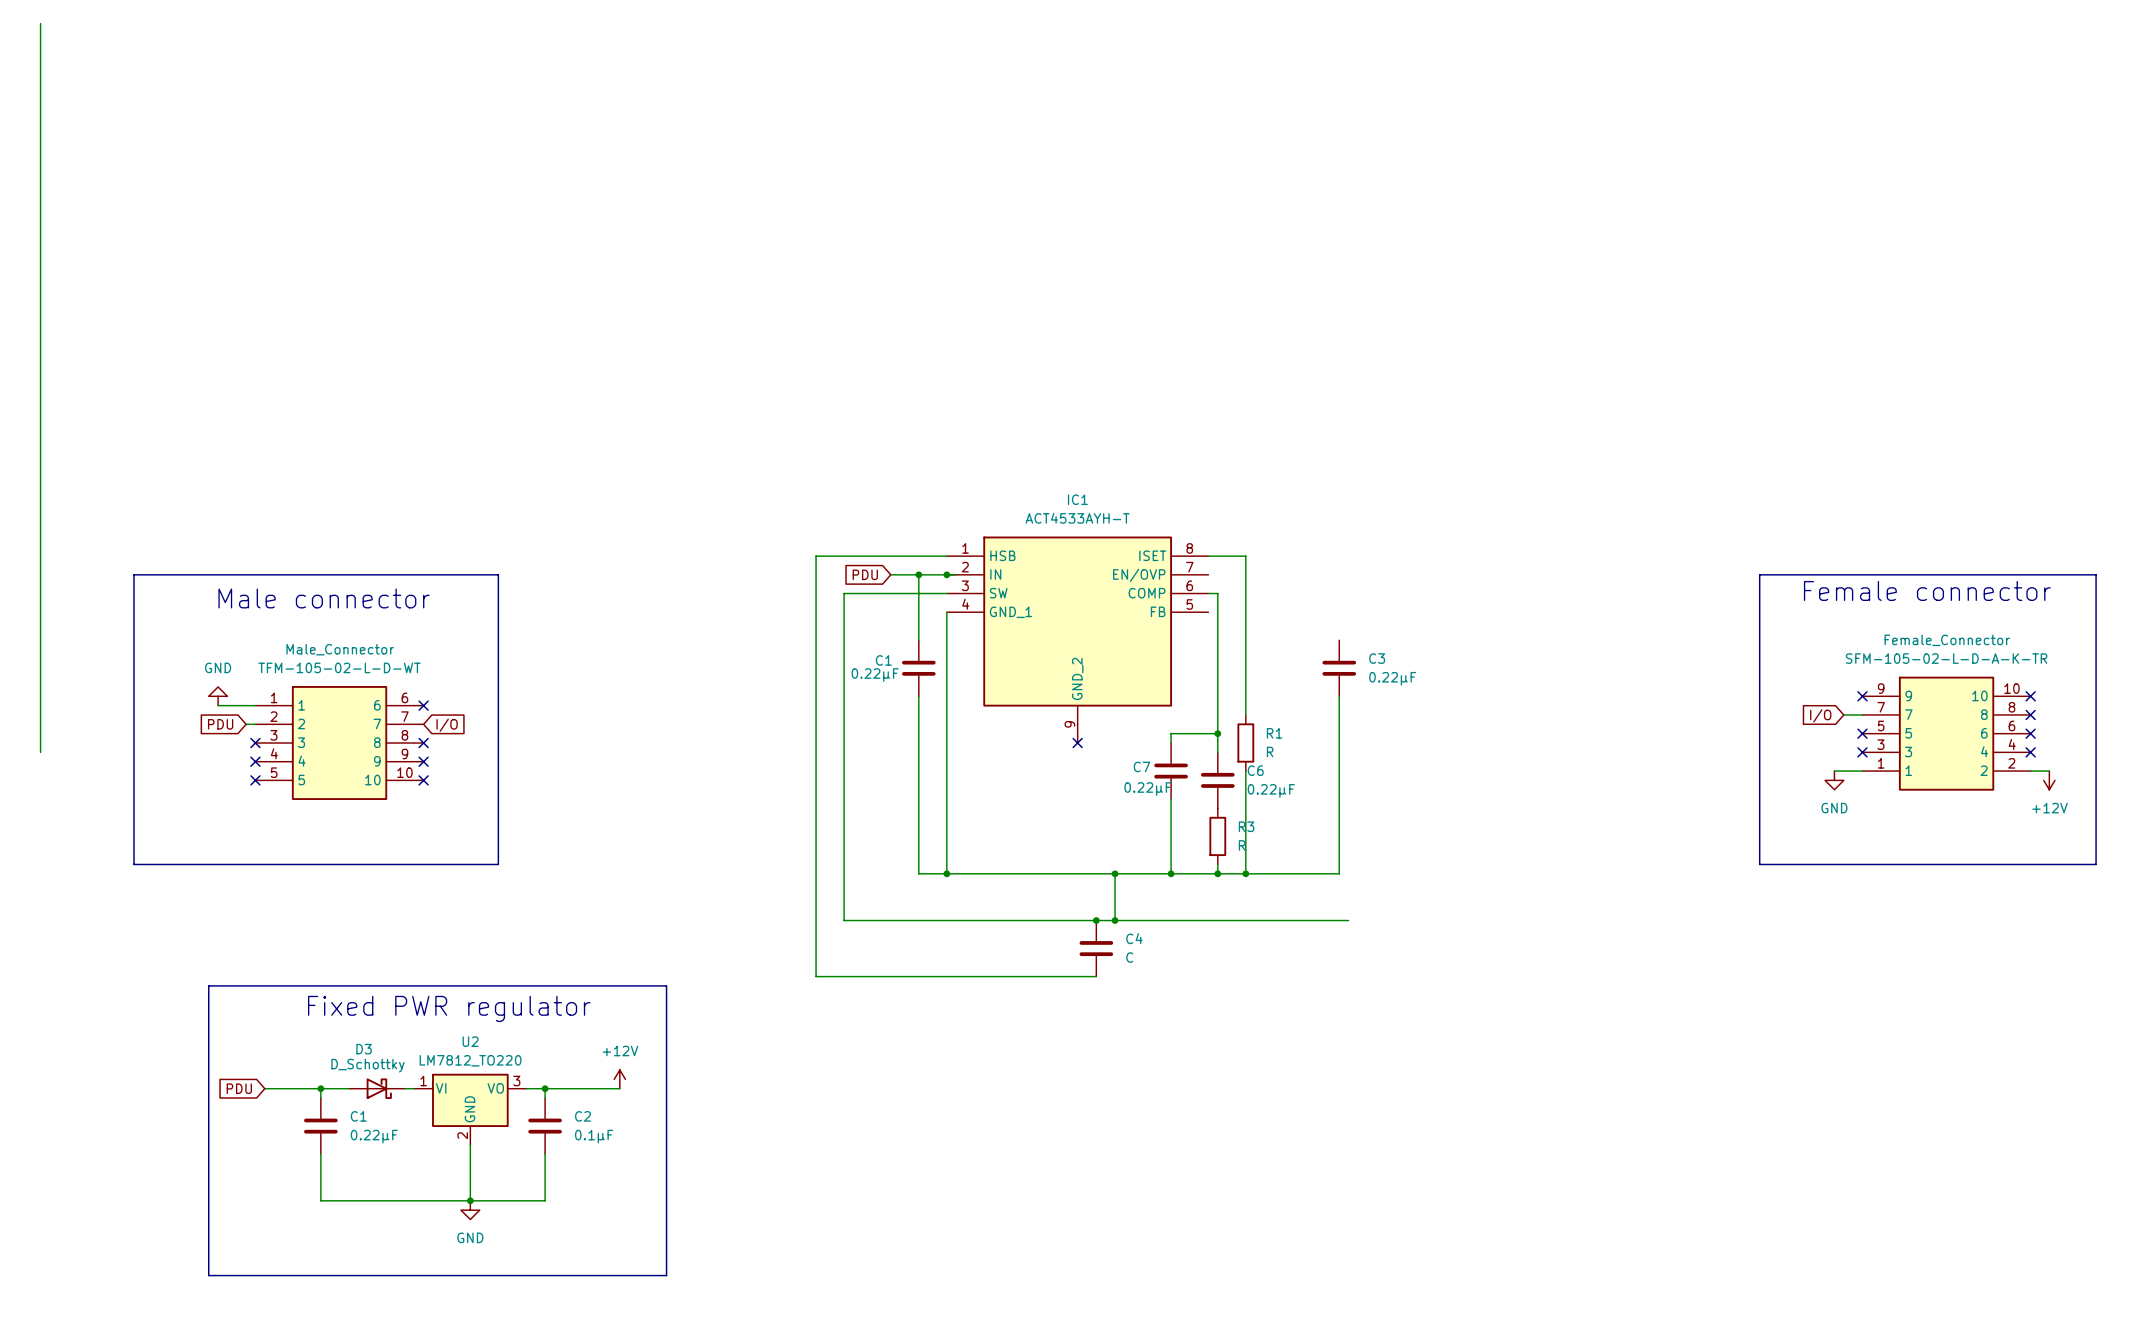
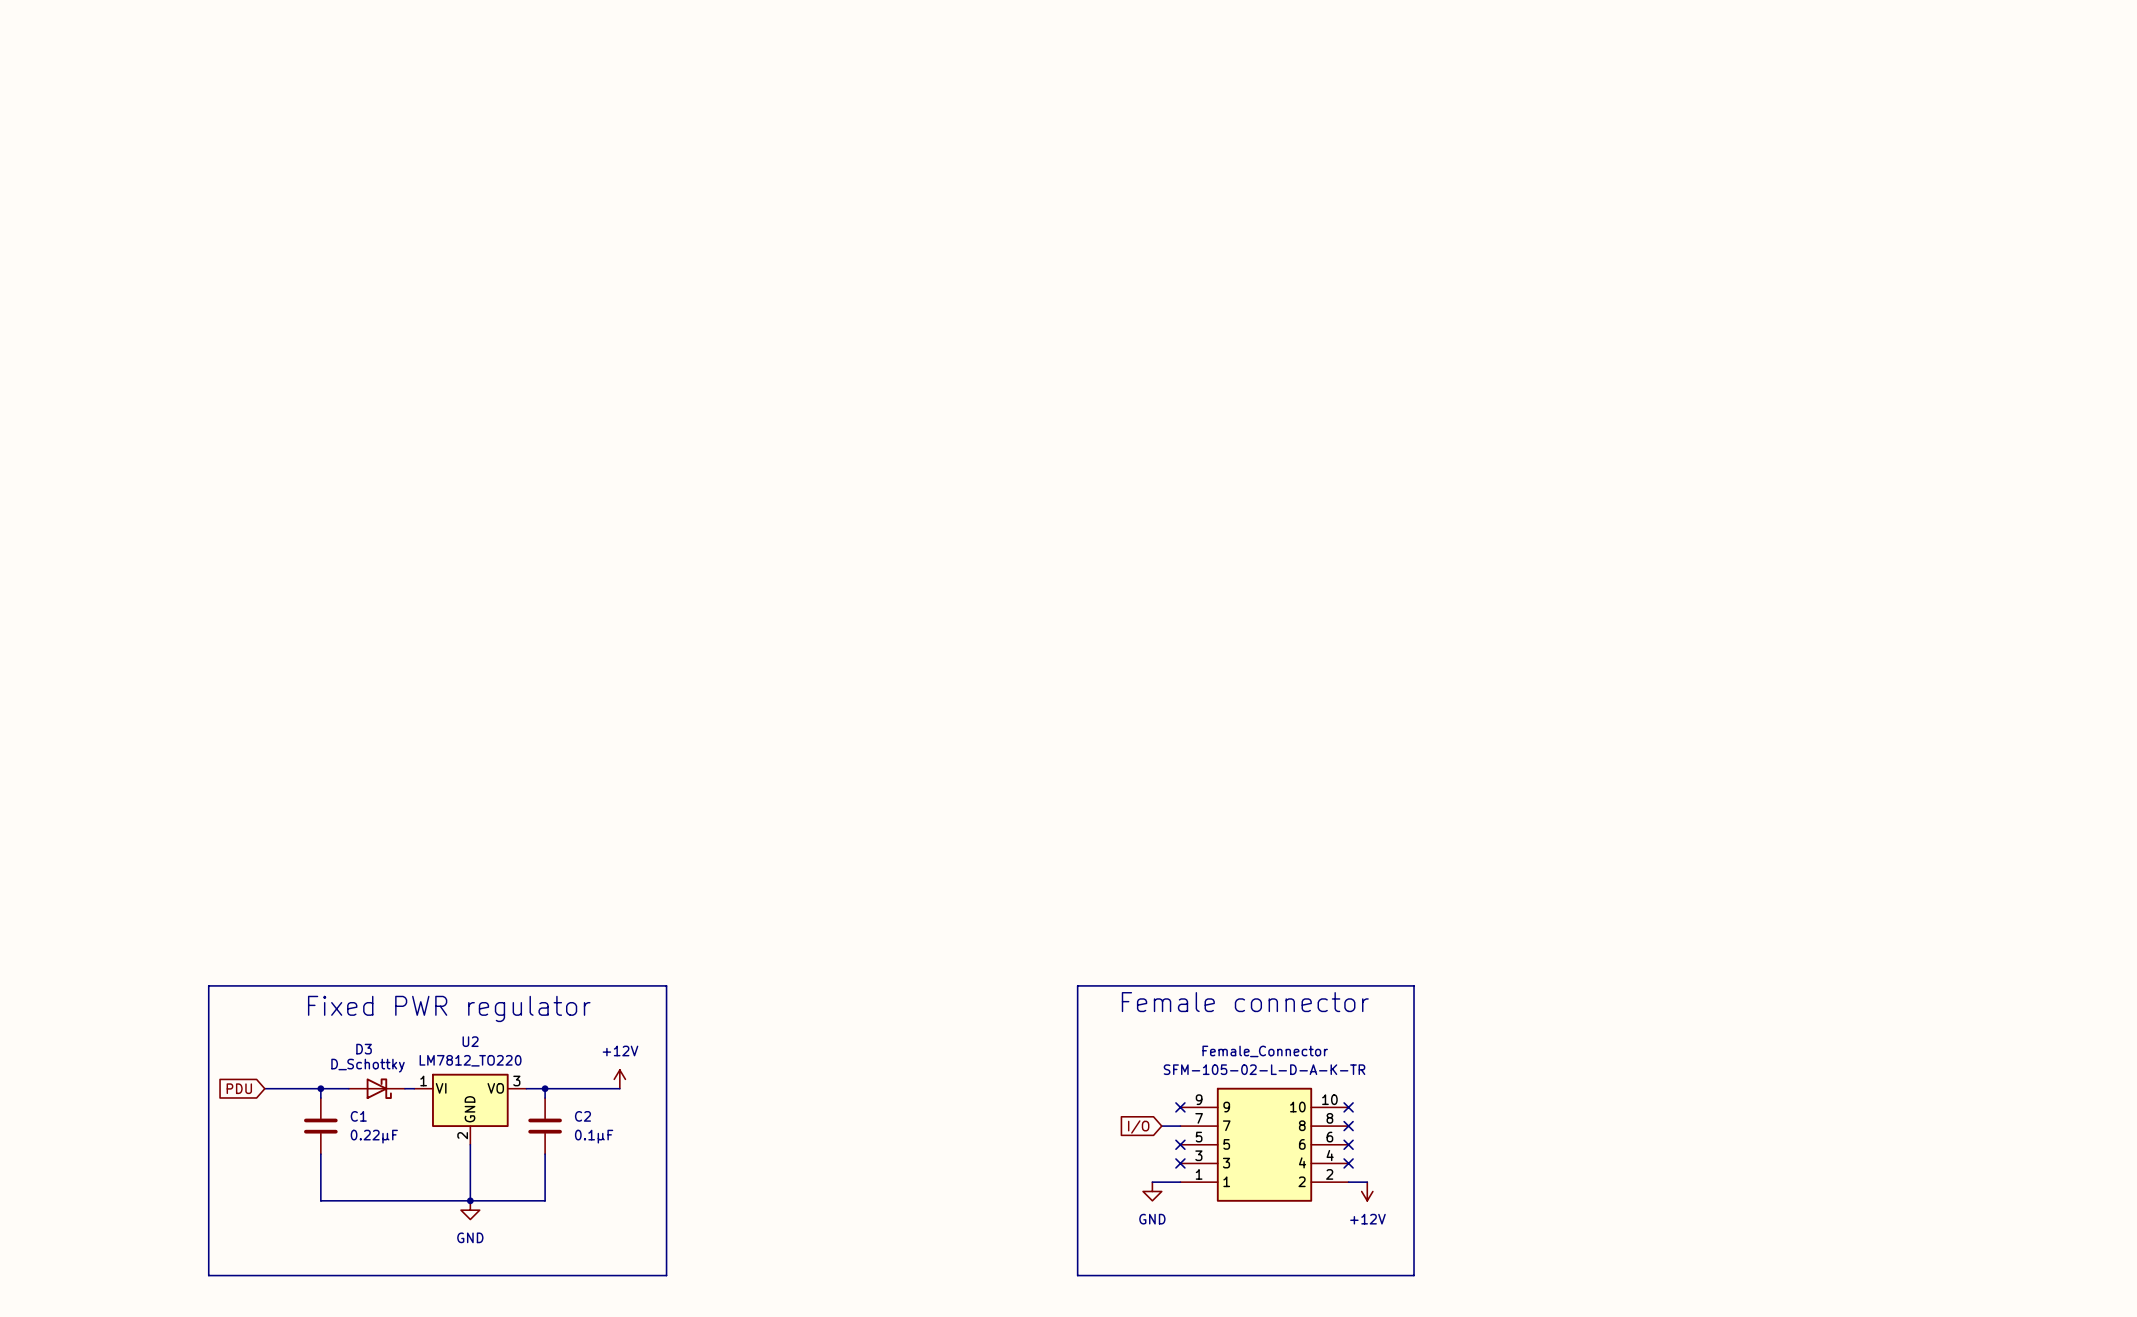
wire: (40, 23) (40, 752) -> none
wire: (946, 556) (816, 556) (816, 976) (1096, 976) -> none
wire: (1208, 556) (1245, 556) (1245, 714) -> none
line: (133, 574) (498, 574) (498, 864) (133, 864) (133, 574) -> none
global label: PDU (865, 574) -> none
wire: (890, 574) (956, 574) -> none
wire: (918, 574) (918, 640) -> none
junction: (918, 574) -> none
junction: (946, 574) -> none
line: (1759, 574) (2096, 574) (2096, 864) (1759, 864) (1759, 574) -> none
text: Female connector (1927, 590) -> none
wire: (946, 593) (844, 593) (844, 920) (1348, 920) -> none
wire: (1208, 593) (1217, 593) (1217, 752) -> none
text: Male connector (324, 598) -> none
wire: (946, 612) (946, 873) -> none
IC1: ACT4533AYH-T (1077, 639) -> none
C1: 0.22µF (918, 668) -> none
C3: 0.22µF (1339, 668) -> none
power symbol: GND (218, 696) -> none
wire: (918, 696) (918, 873) (1339, 873) (1339, 696) -> none
no-connect mark: (1862, 696) -> none
no-connect mark: (2030, 696) -> none
wire: (218, 705) (255, 705) -> none
no-connect mark: (423, 705) -> none
wire: (1843, 714) (1862, 714) -> none
no-connect mark: (2030, 714) -> none
global label: I/O (1820, 715) -> none
global label: PDU (220, 724) -> none
wire: (246, 724) (255, 724) -> none
global label: I/O (447, 725) -> none
wire: (1217, 733) (1171, 733) (1171, 743) -> none
junction: (1217, 733) -> none
no-connect mark: (1862, 733) -> none
Female_Connector: SFM-105-02-L-D-A-K-TR (1946, 733) -> none
no-connect mark: (2030, 733) -> none
no-connect mark: (255, 743) -> none
Male_Connector: TFM-105-02-L-D-WT (339, 743) -> none
no-connect mark: (423, 743) -> none
no-connect mark: (1077, 743) -> none
R1: R (1245, 743) -> none
no-connect mark: (1862, 752) -> none
no-connect mark: (2030, 752) -> none
no-connect mark: (255, 761) -> none
no-connect mark: (423, 761) -> none
C7: 0.22µF (1171, 771) -> none
wire: (1245, 771) (1245, 873) -> none
wire: (1834, 771) (1862, 771) -> none
wire: (2030, 771) (2049, 771) -> none
no-connect mark: (255, 780) -> none
no-connect mark: (423, 780) -> none
C6: 0.22µF (1217, 780) -> none
power symbol: GND (1834, 780) -> none
power symbol: +12V (2049, 780) -> none
wire: (1171, 799) (1171, 873) -> none
R3: R (1217, 836) -> none
wire: (1217, 864) (1217, 873) -> none
junction: (946, 873) -> none
wire: (1115, 873) (1115, 920) -> none
junction: (1115, 873) -> none
junction: (1171, 873) -> none
junction: (1217, 873) -> none
junction: (1245, 873) -> none
junction: (1096, 920) -> none
junction: (1115, 920) -> none
C4: C (1096, 948) -> none
line: none -> (1077, 985) (1414, 985) (1414, 1275) (1077, 1275) (1077, 985)
text: none -> Female connector (1245, 1002)
no-connect mark: none -> (1180, 1107)
no-connect mark: none -> (1348, 1107)
global label: none -> I/O (1138, 1126)
wire: none -> (1161, 1126) (1180, 1126)
no-connect mark: none -> (1348, 1126)
no-connect mark: none -> (1180, 1144)
Female_Connector: none -> SFM-105-02-L-D-A-K-TR (1264, 1144)
no-connect mark: none -> (1348, 1144)
no-connect mark: none -> (1180, 1163)
no-connect mark: none -> (1348, 1163)
wire: none -> (1152, 1182) (1180, 1182)
wire: none -> (1348, 1182) (1367, 1182)
power symbol: none -> GND (1152, 1191)
power symbol: none -> +12V (1367, 1191)

